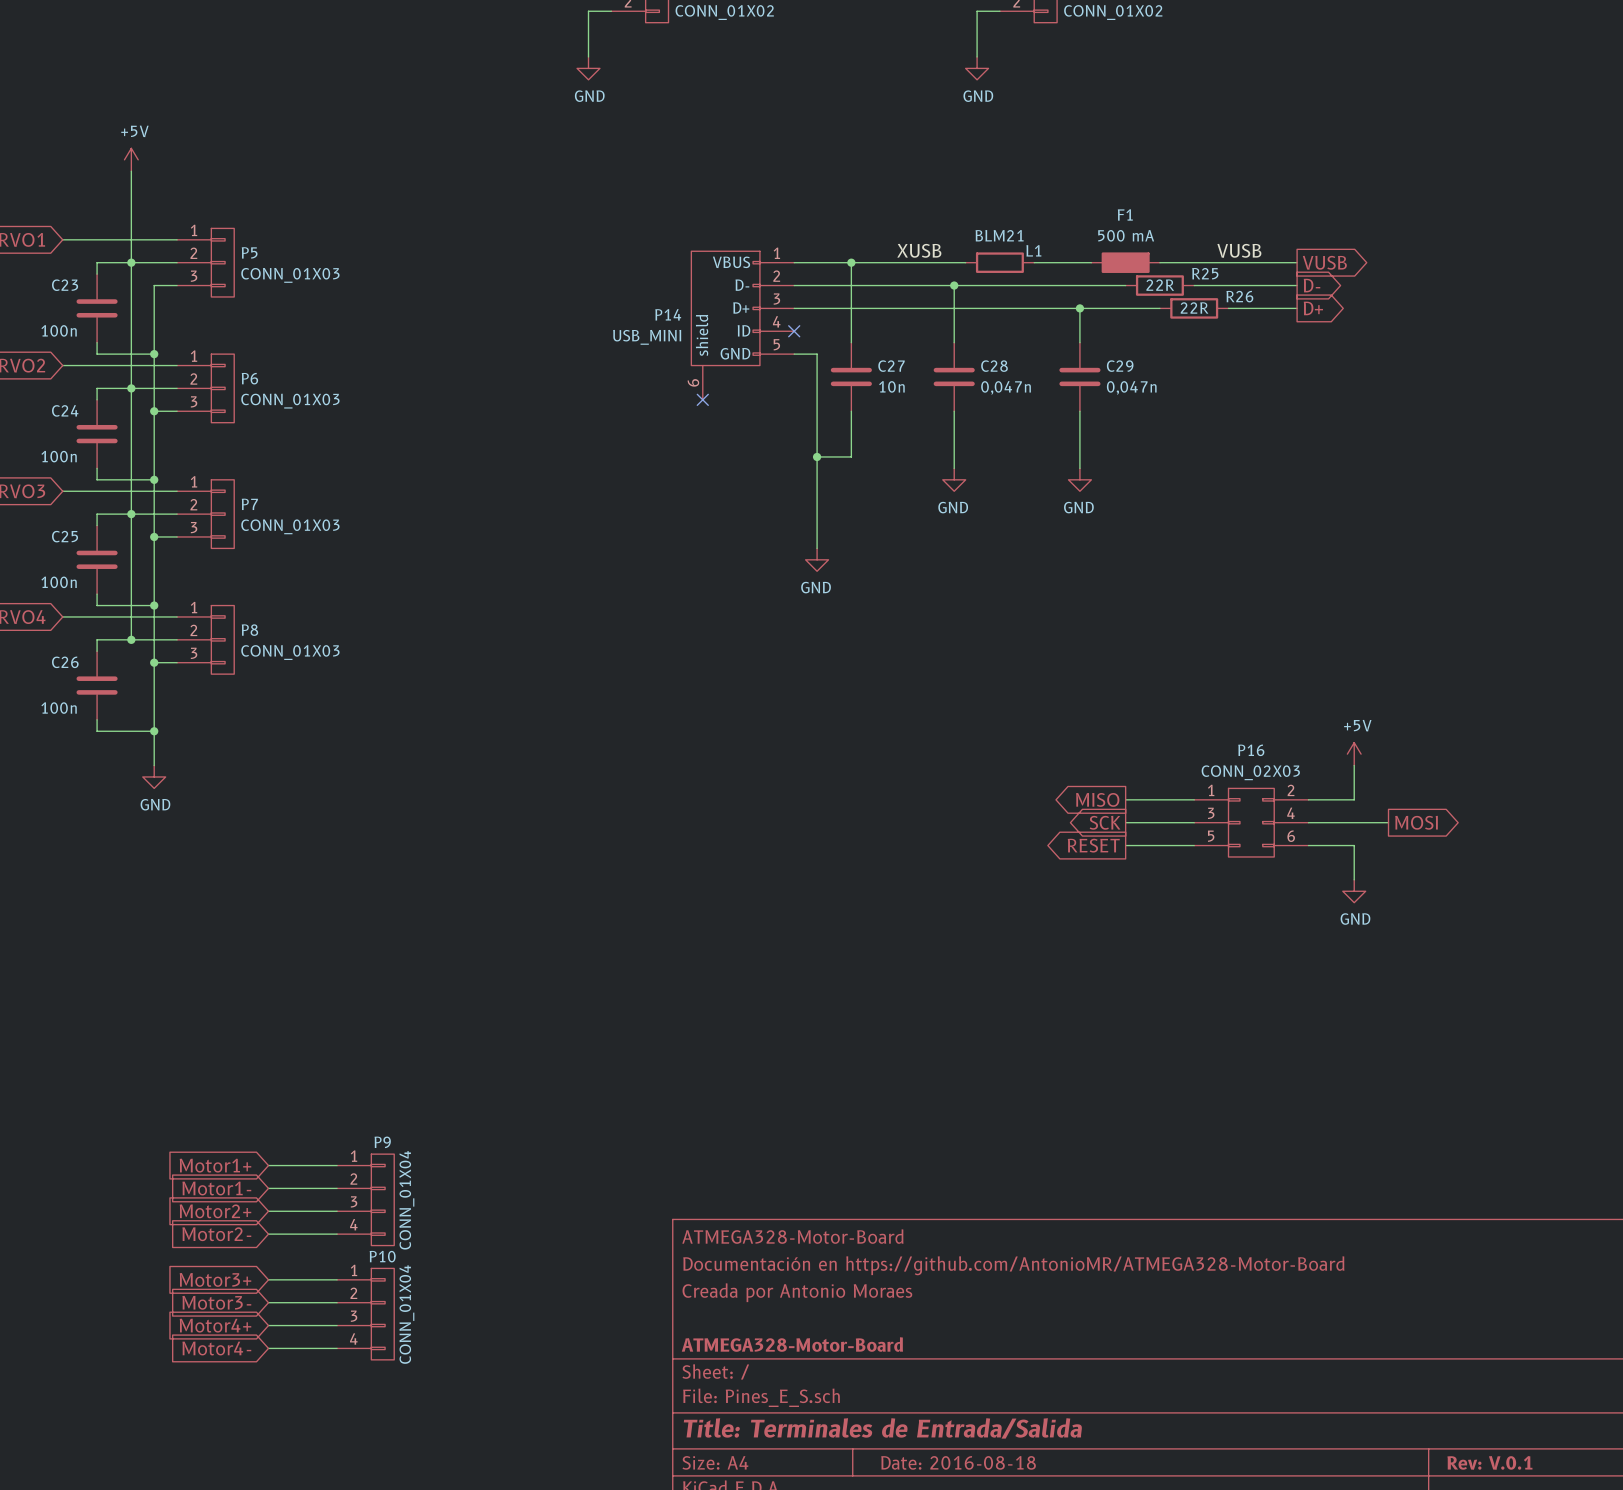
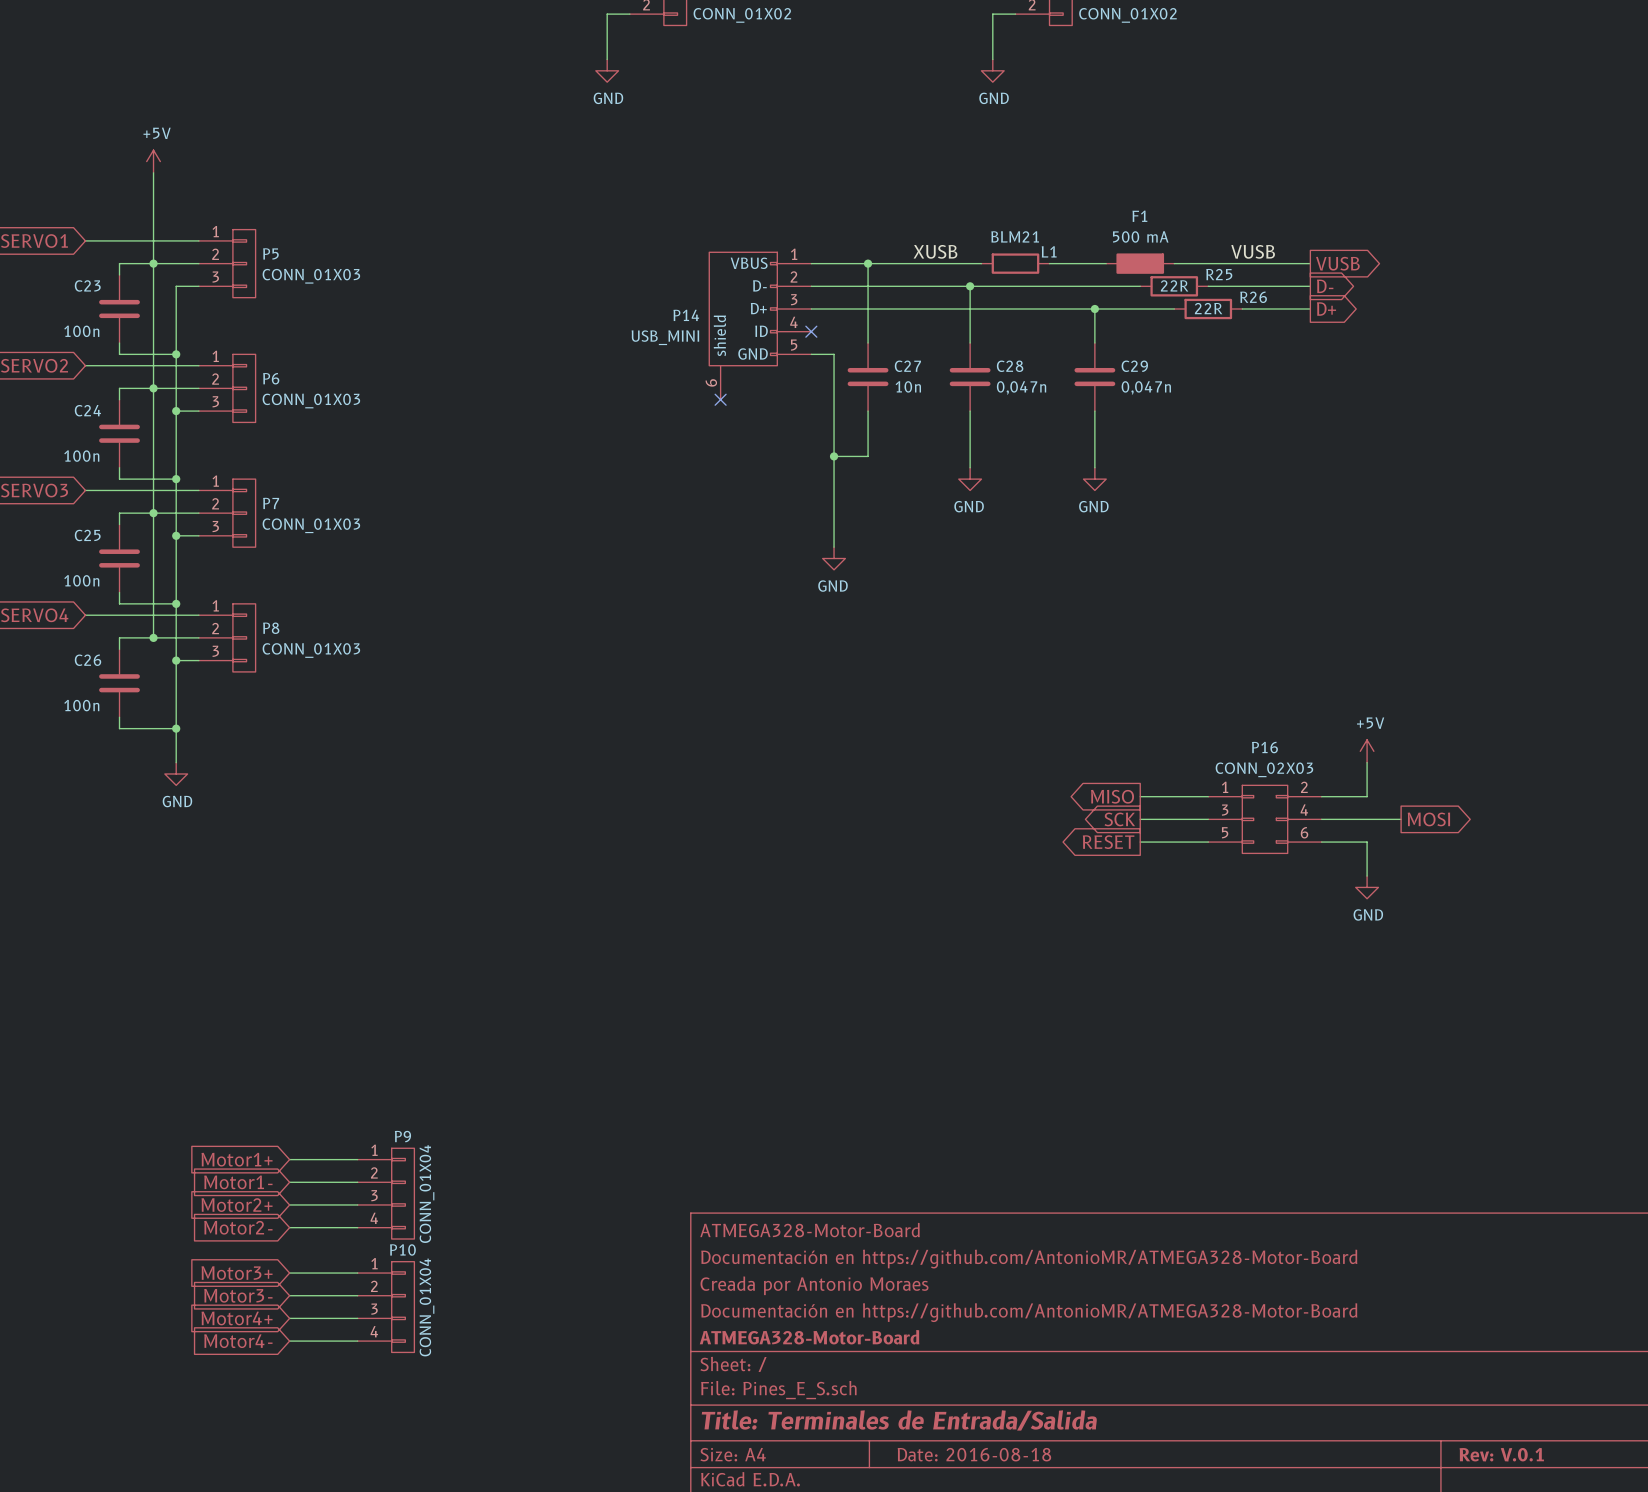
title block: none -> Documentación en https://github.com/AntonioMR/ATMEGA328-Motor-Board (1029, 1312)

